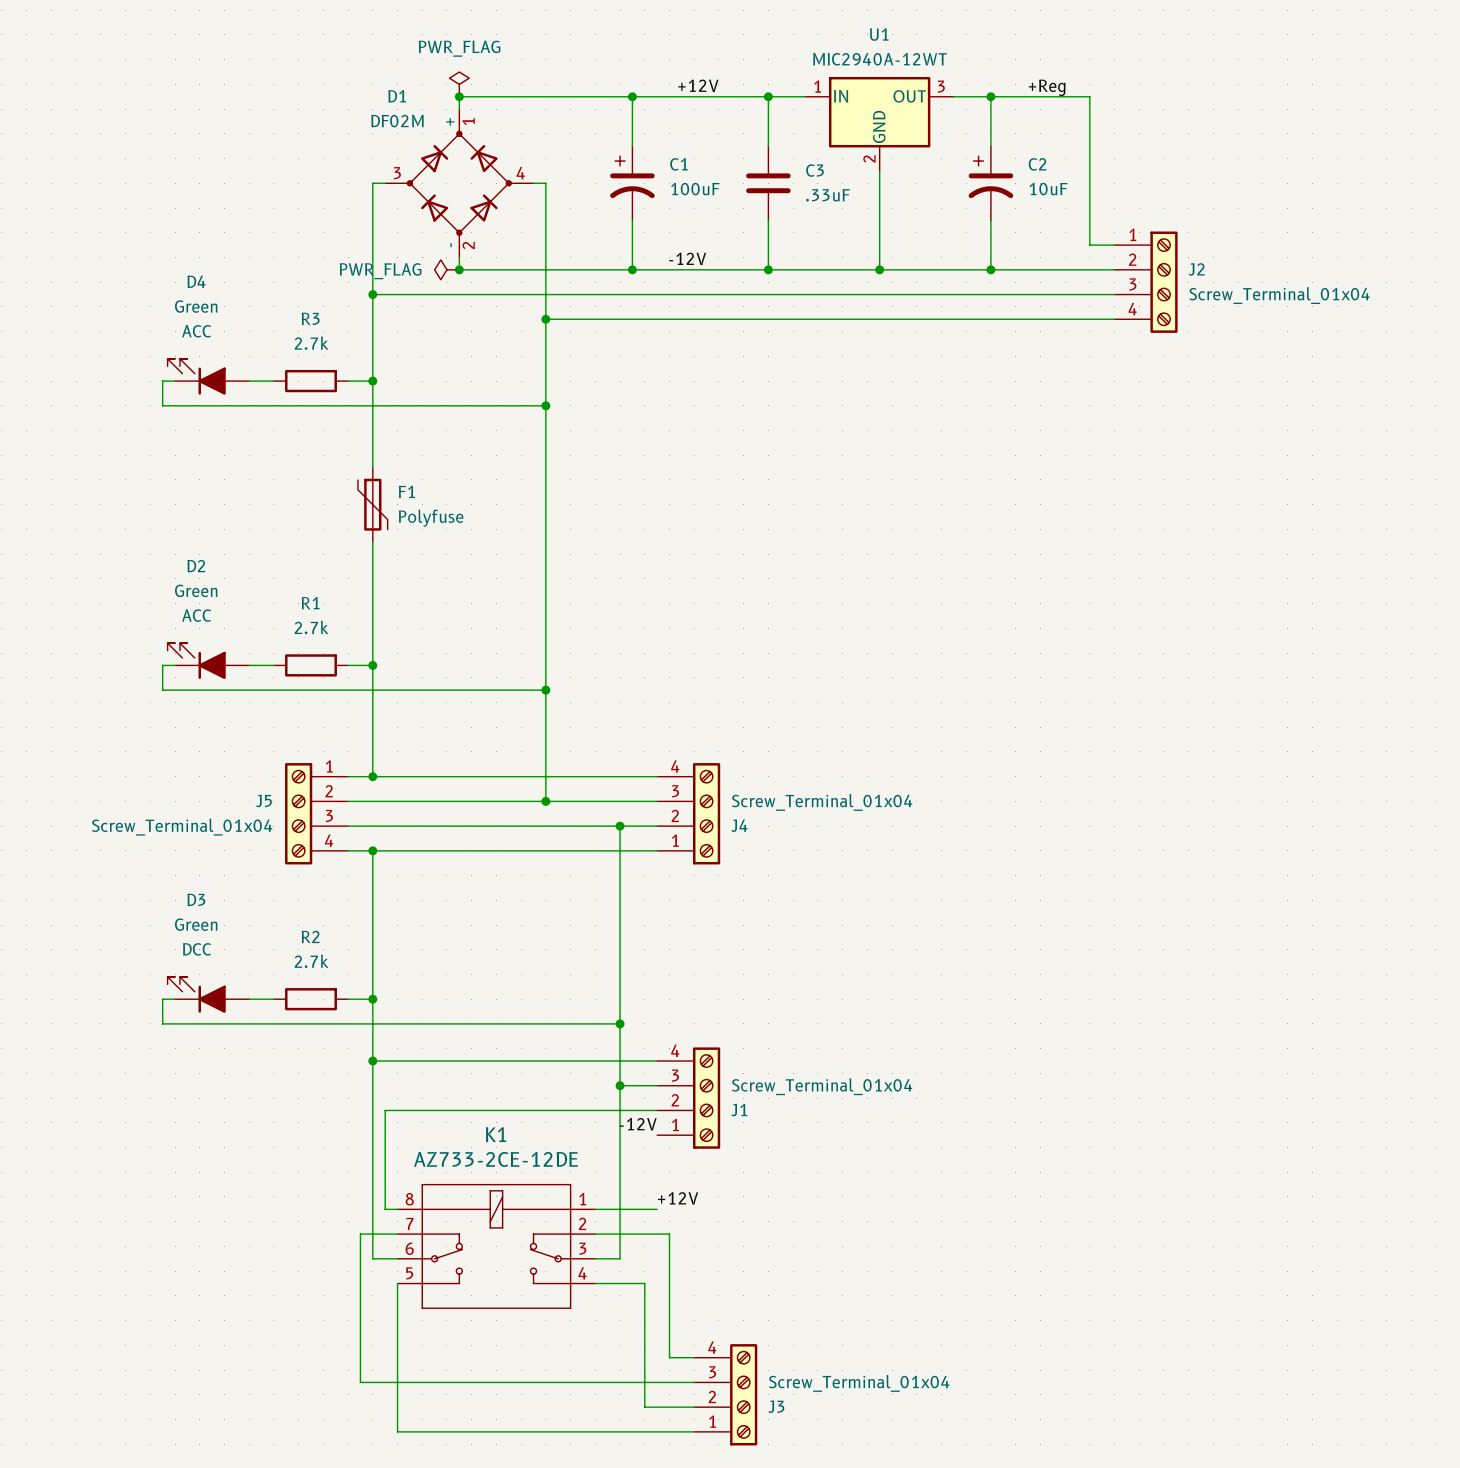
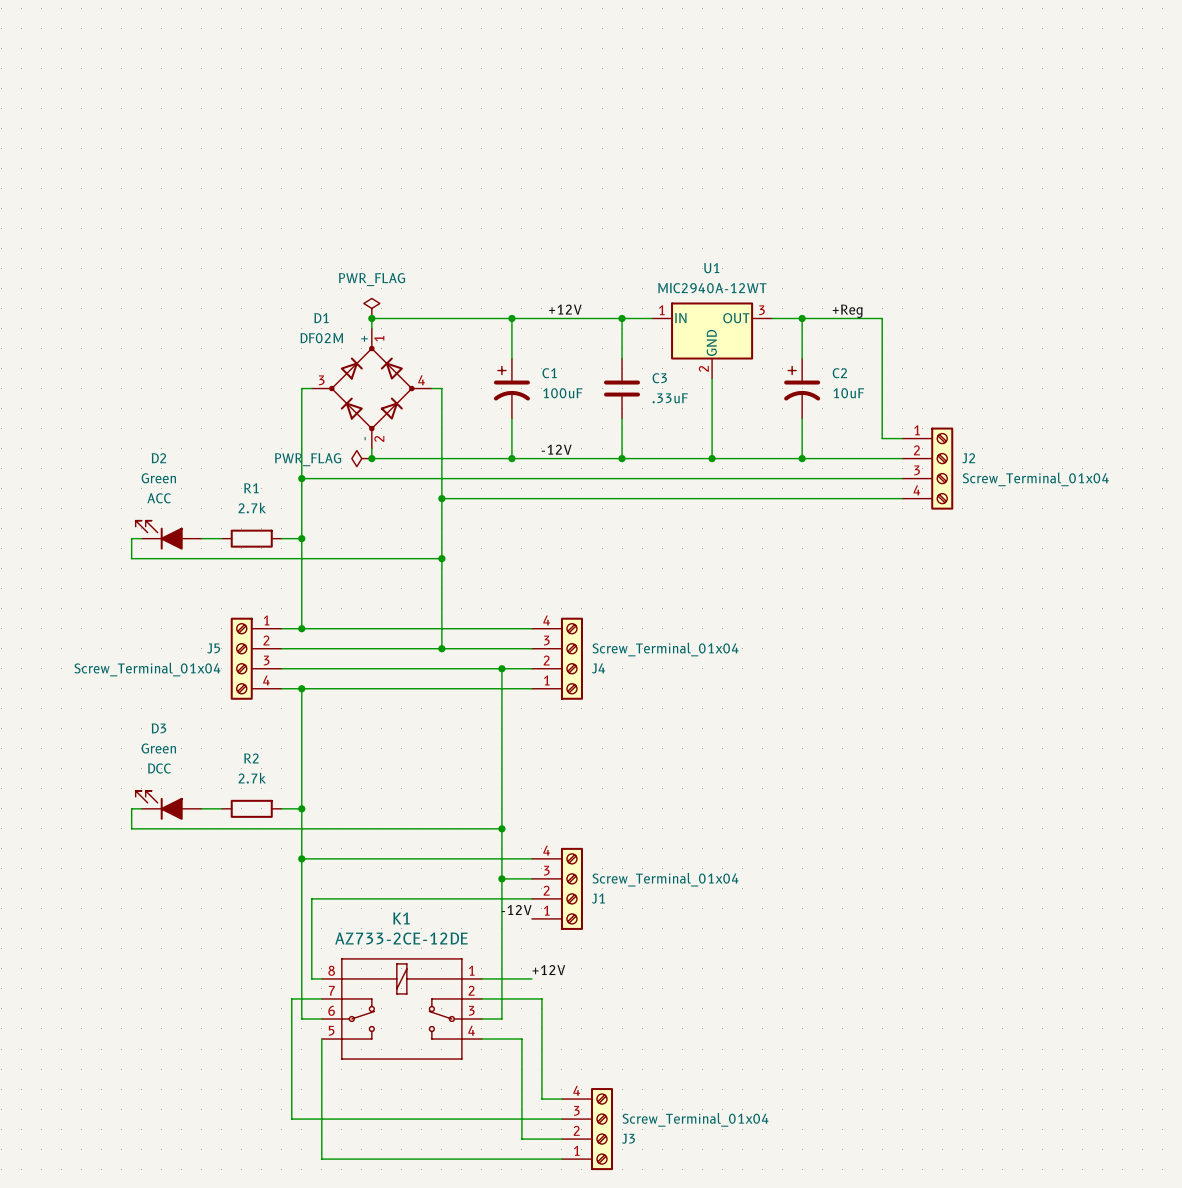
power symbol: PWR_FLAG (459, 84) -> none
label: +12V (698, 85) -> none
label: +Reg (1047, 87) -> none
junction: (459, 96) -> none
wire: (632, 96) (632, 146) -> none
junction: (632, 96) -> none
wire: (768, 96) (768, 146) -> none
junction: (768, 96) -> none
wire: (805, 96) (459, 96) (459, 109) -> none
wire: (953, 96) (1089, 96) (1089, 245) (1114, 245) -> none
wire: (990, 96) (990, 146) -> none
junction: (990, 96) -> none
U1 position: (879, 123) -> (712, 340)
wire: (879, 170) (879, 269) -> none
wire: (385, 183) (372, 183) (372, 467) -> none
D1 position: (459, 183) -> (371, 388)
wire: (533, 183) (545, 183) (545, 479) -> (431, 388) (441, 388)
C1 position: (632, 183) -> (511, 388)
C3 position: (768, 183) -> (622, 388)
C2 position: (990, 183) -> (802, 388)
wire: (632, 220) (632, 269) -> (511, 318) (511, 358)
wire: (768, 220) (768, 269) -> (622, 318) (622, 358)
wire: (990, 220) (990, 269) -> (802, 318) (802, 358)
wire: (459, 257) (459, 269) (1114, 269) -> none
label: -12V (687, 258) -> none
power symbol rotation: 0° (446, 269) -> 90° clockwise (371, 308)
power symbol position: PWR_FLAG (446, 269) -> PWR_FLAG (371, 308)
junction: (459, 269) -> none
junction: (632, 269) -> none
junction: (768, 269) -> none
junction: (879, 269) -> none
junction: (990, 269) -> none
power symbol text position: PWR_FLAG (380, 271) -> PWR_FLAG (372, 279)
J2 position: (1146, 282) -> (927, 468)
wire: (372, 294) (1114, 294) -> none
junction: (372, 294) -> none
wire: (545, 319) (1114, 319) -> none
junction: (545, 319) -> none
D4: Green (208, 376) -> none
wire: (175, 381) (162, 381) (162, 405) (545, 405) -> none
wire: (249, 381) (273, 381) -> none
R3: 2.7k (311, 381) -> none
wire: (348, 381) (372, 381) -> none
junction: (372, 381) -> none
label: none -> +12V (565, 309)
label: none -> +Reg (847, 311)
junction: none -> (371, 318)
junction: none -> (511, 318)
junction: none -> (622, 318)
wire: none -> (652, 318) (371, 318) (371, 328)
wire: none -> (772, 318) (882, 318) (882, 438) (902, 438)
junction: none -> (802, 318)
junction: (545, 405) -> none
wire: none -> (712, 378) (712, 458)
F1: Polyfuse (372, 504) -> none
wire: none -> (511, 418) (511, 458)
wire: none -> (622, 418) (622, 458)
wire: none -> (802, 418) (802, 458)
wire: none -> (371, 448) (371, 458) (902, 458)
label: none -> -12V (556, 449)
power symbol: none -> PWR_FLAG (361, 458)
junction: none -> (371, 458)
junction: none -> (511, 458)
junction: none -> (622, 458)
junction: none -> (712, 458)
junction: none -> (802, 458)
wire: none -> (301, 478) (902, 478)
junction: none -> (301, 478)
wire: none -> (441, 498) (902, 498)
junction: none -> (441, 498)

